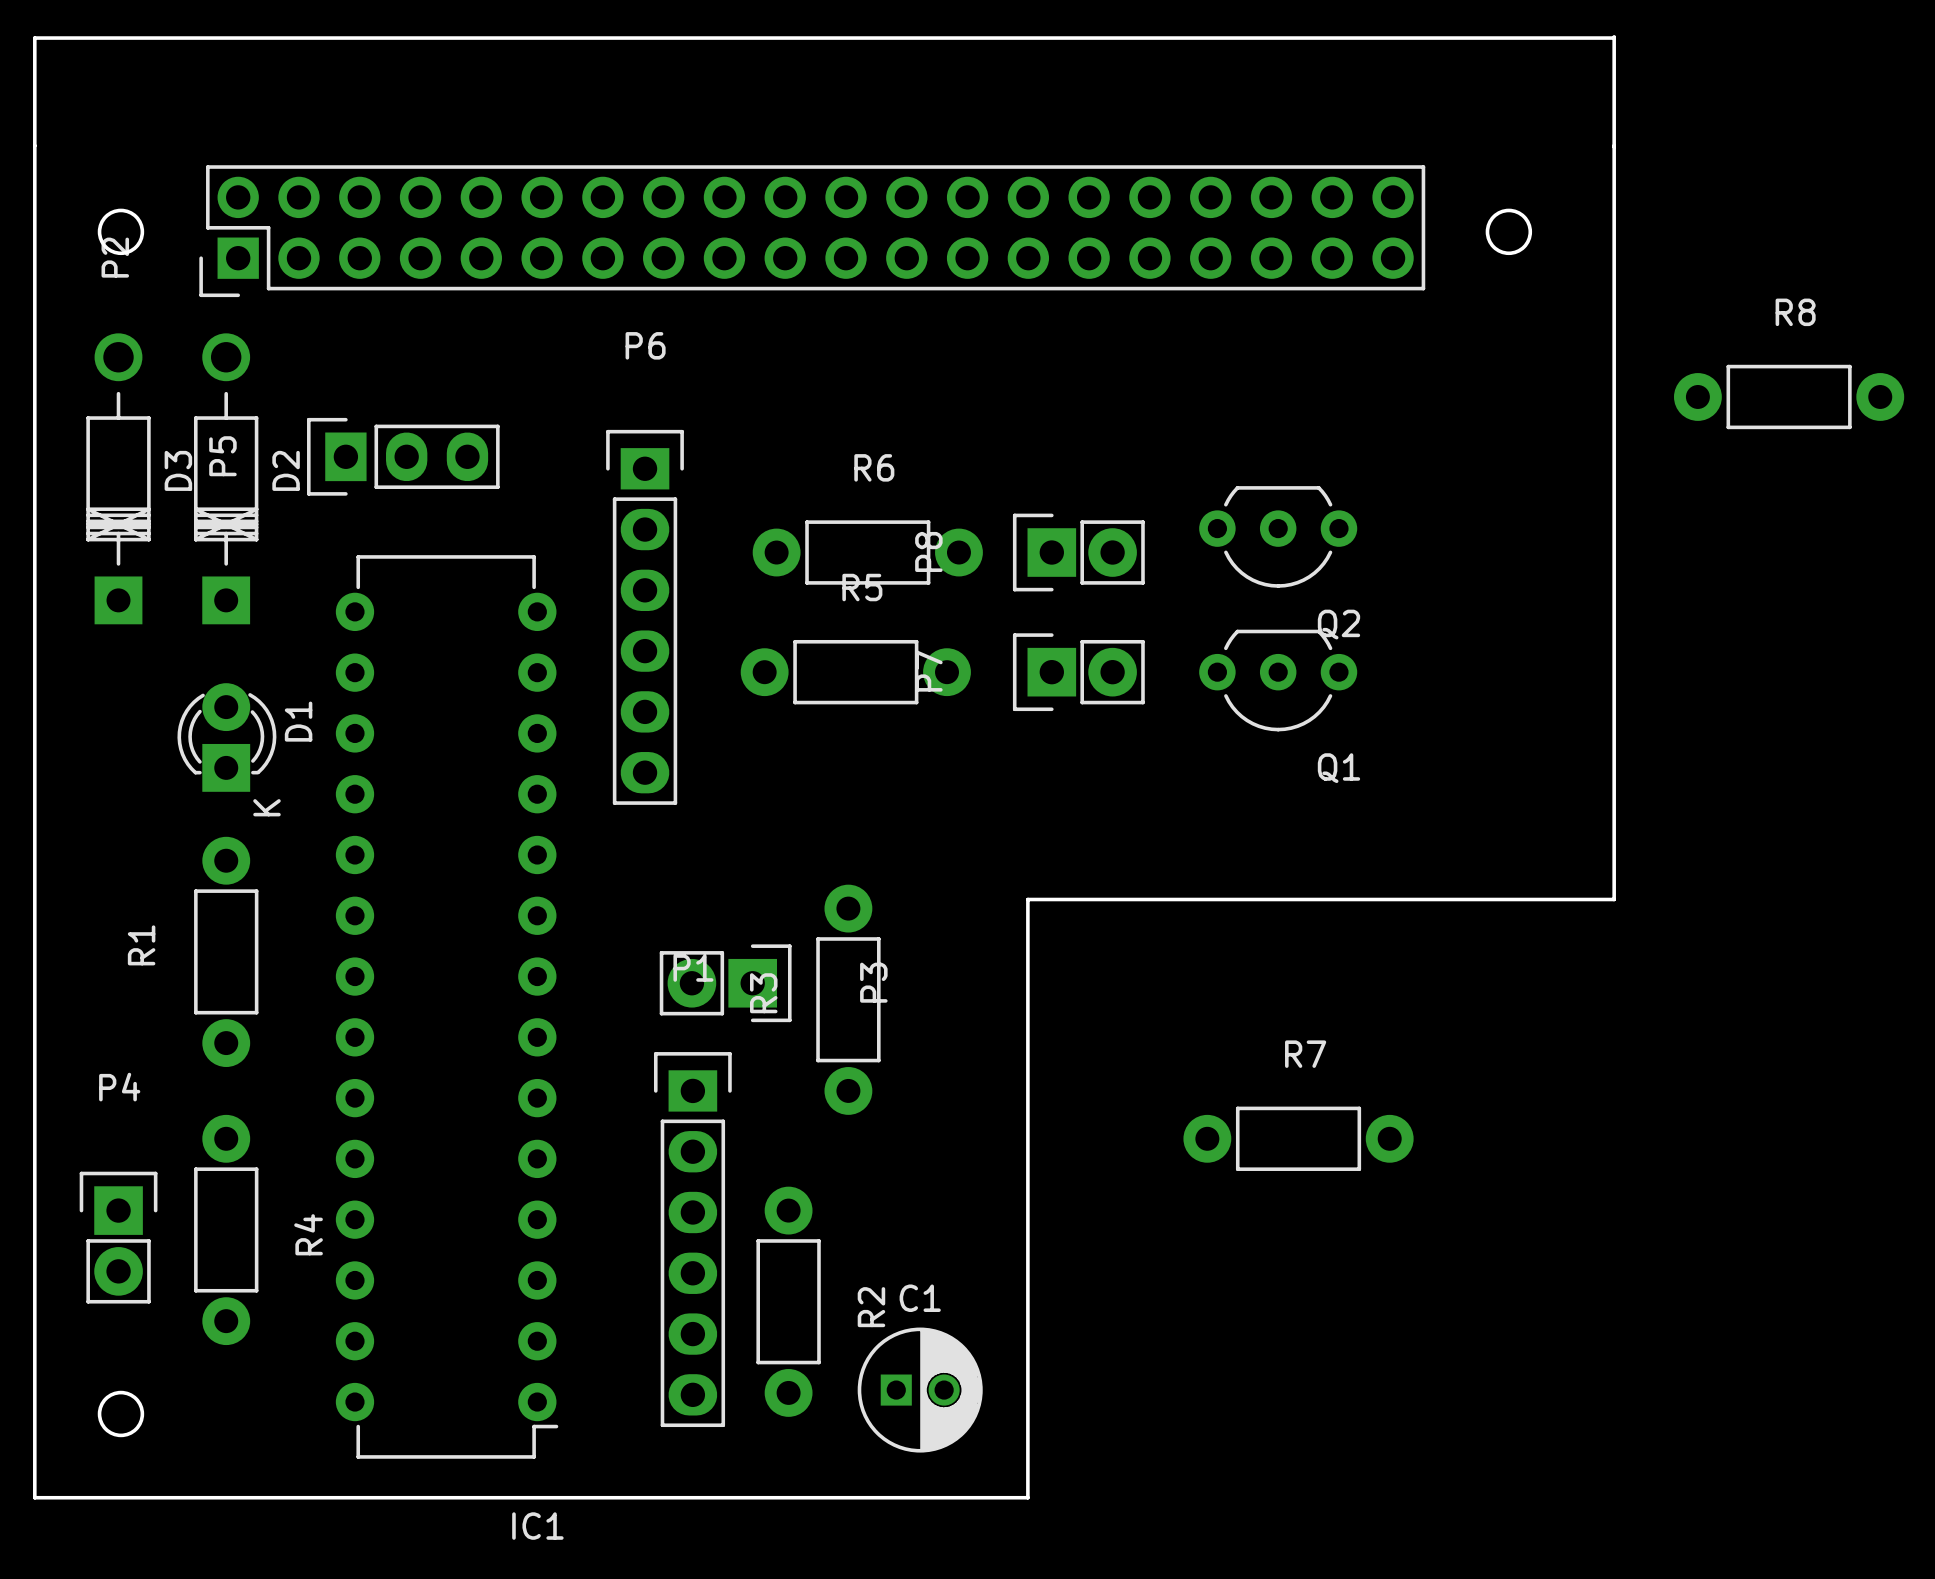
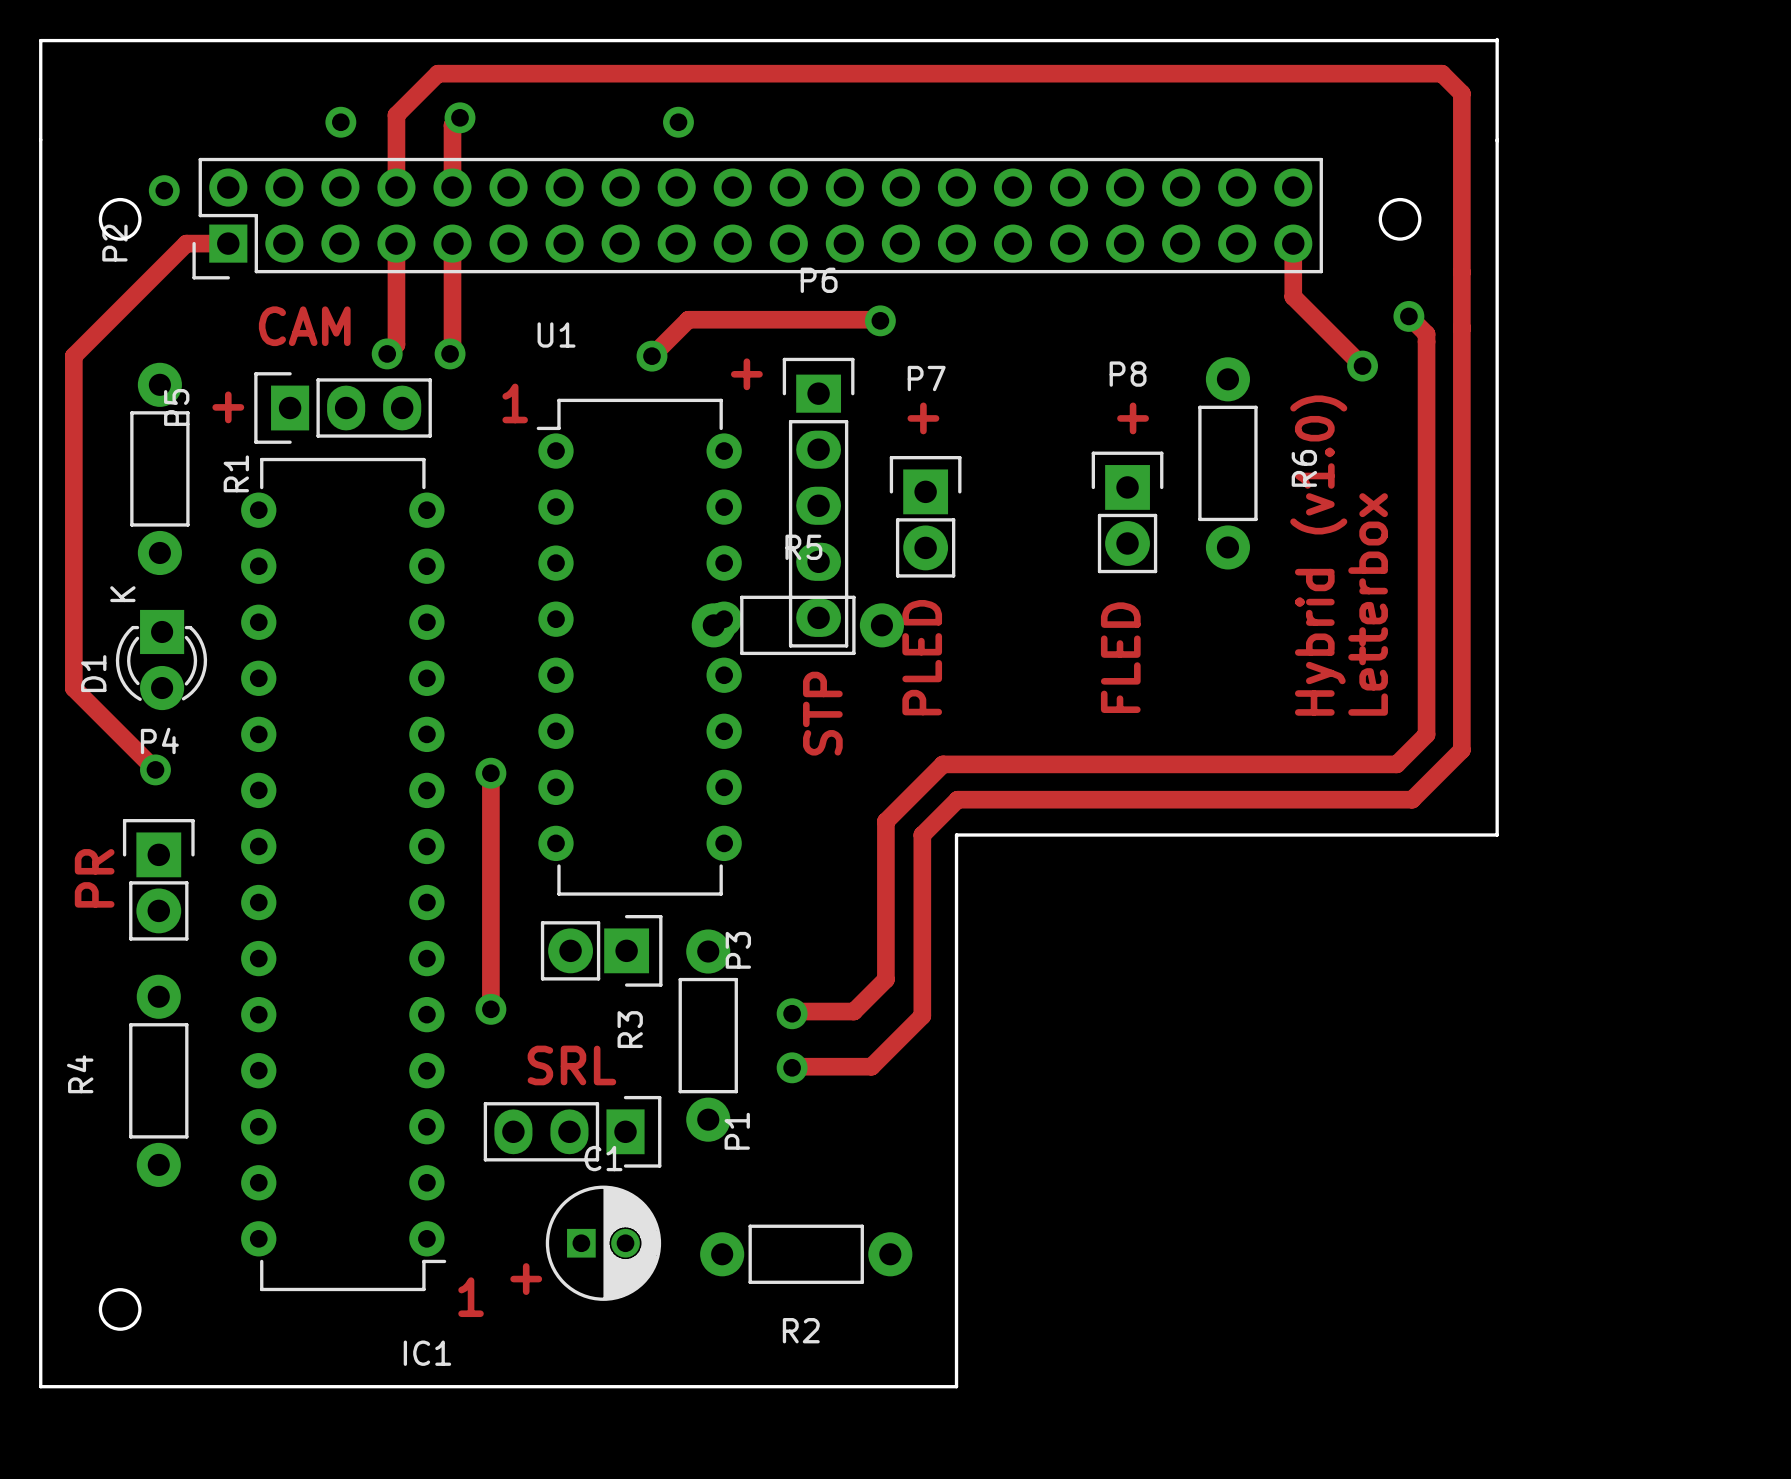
track: none -> (460, 117) (452, 125) (452, 187)
via: none -> (460, 117)
via: none -> (340, 122)
via: none -> (678, 122)
track: none -> (396, 187) (396, 115) (437, 73) (1442, 73) (1461, 93) (1461, 750) (1412, 799) (957, 799) (922, 835) (922, 1015) (871, 1066) (792, 1067)
via: none -> (164, 190)
track: none -> (228, 243) (186, 243) (73, 356) (73, 688) (155, 769)
track: none -> (396, 243) (396, 344) (387, 353)
track: none -> (452, 243) (452, 351) (450, 353)
track: none -> (1293, 243) (1293, 296) (1362, 366)
track: none -> (1408, 316) (1426, 334) (1426, 734) (1396, 764) (943, 764) (885, 821) (885, 979) (853, 1011) (794, 1011) (792, 1013)
via: none -> (1408, 316)
track: none -> (880, 320) (688, 319) (651, 356)
via: none -> (880, 320)
text: none -> CAM (304, 326)
via: none -> (387, 353)
via: none -> (450, 353)
via: none -> (651, 356)
via: none -> (1362, 366)
R8: (1789, 396) -> none
text: none -> + (746, 374)
P6 footprint: [606, 429, 684, 805] -> [782, 357, 855, 648]
text: none -> 1 (515, 403)
text: none -> + (228, 407)
text: none -> + (923, 418)
text: none -> + (1133, 418)
P5 position: (403, 456) -> (343, 408)
D3: (118, 478) -> none
D2: (226, 478) -> none
Q2: (1278, 536) -> none
R6 rotation: 0° (867, 552) -> 90° clockwise (1227, 463)
R6 position: (867, 552) -> (1227, 463)
P8 rotation: 0° (1078, 552) -> 90° clockwise (1127, 512)
P8 position: (1078, 552) -> (1127, 512)
text: none -> Hybrid (v1.0) (1318, 555)
text: none -> Letterbox (1368, 604)
P7 rotation: 0° (1078, 672) -> 90° clockwise (925, 516)
P7 position: (1078, 672) -> (925, 516)
Q1: (1278, 680) -> none
U1: none -> (639, 647)
text: none -> PLED (922, 657)
text: none -> FLED (1120, 657)
D1 rotation: 0° (226, 737) -> 180° (161, 660)
D1 position: (226, 737) -> (161, 660)
text: none -> STP (822, 713)
via: none -> (155, 769)
track: none -> (490, 773) (490, 1009)
via: none -> (490, 773)
R1 name position: R1 (141, 945) -> R1 (236, 473)
text: none -> PR (94, 878)
R1 position: (226, 951) -> (159, 468)
P1 name position: P1 (693, 968) -> P1 (737, 1131)
P3 position: (725, 983) -> (601, 950)
R3 position: (848, 999) -> (708, 1035)
IC1 position: (447, 1006) -> (343, 874)
P1 footprint: [653, 1052, 732, 1428] -> [483, 1095, 662, 1168]
via: none -> (490, 1009)
via: none -> (792, 1013)
R7: (1298, 1138) -> none
text: none -> SRL (571, 1065)
via: none -> (792, 1067)
R4 position: (226, 1229) -> (158, 1080)
R4 name position: R4 (308, 1234) -> R4 (80, 1074)
P4 position: (118, 1237) -> (158, 879)
R2 rotation: 0° (788, 1301) -> 90° clockwise (806, 1254)
text: none -> + (526, 1279)
C1 position: (920, 1390) -> (603, 1243)
text: none -> 1 (471, 1297)

